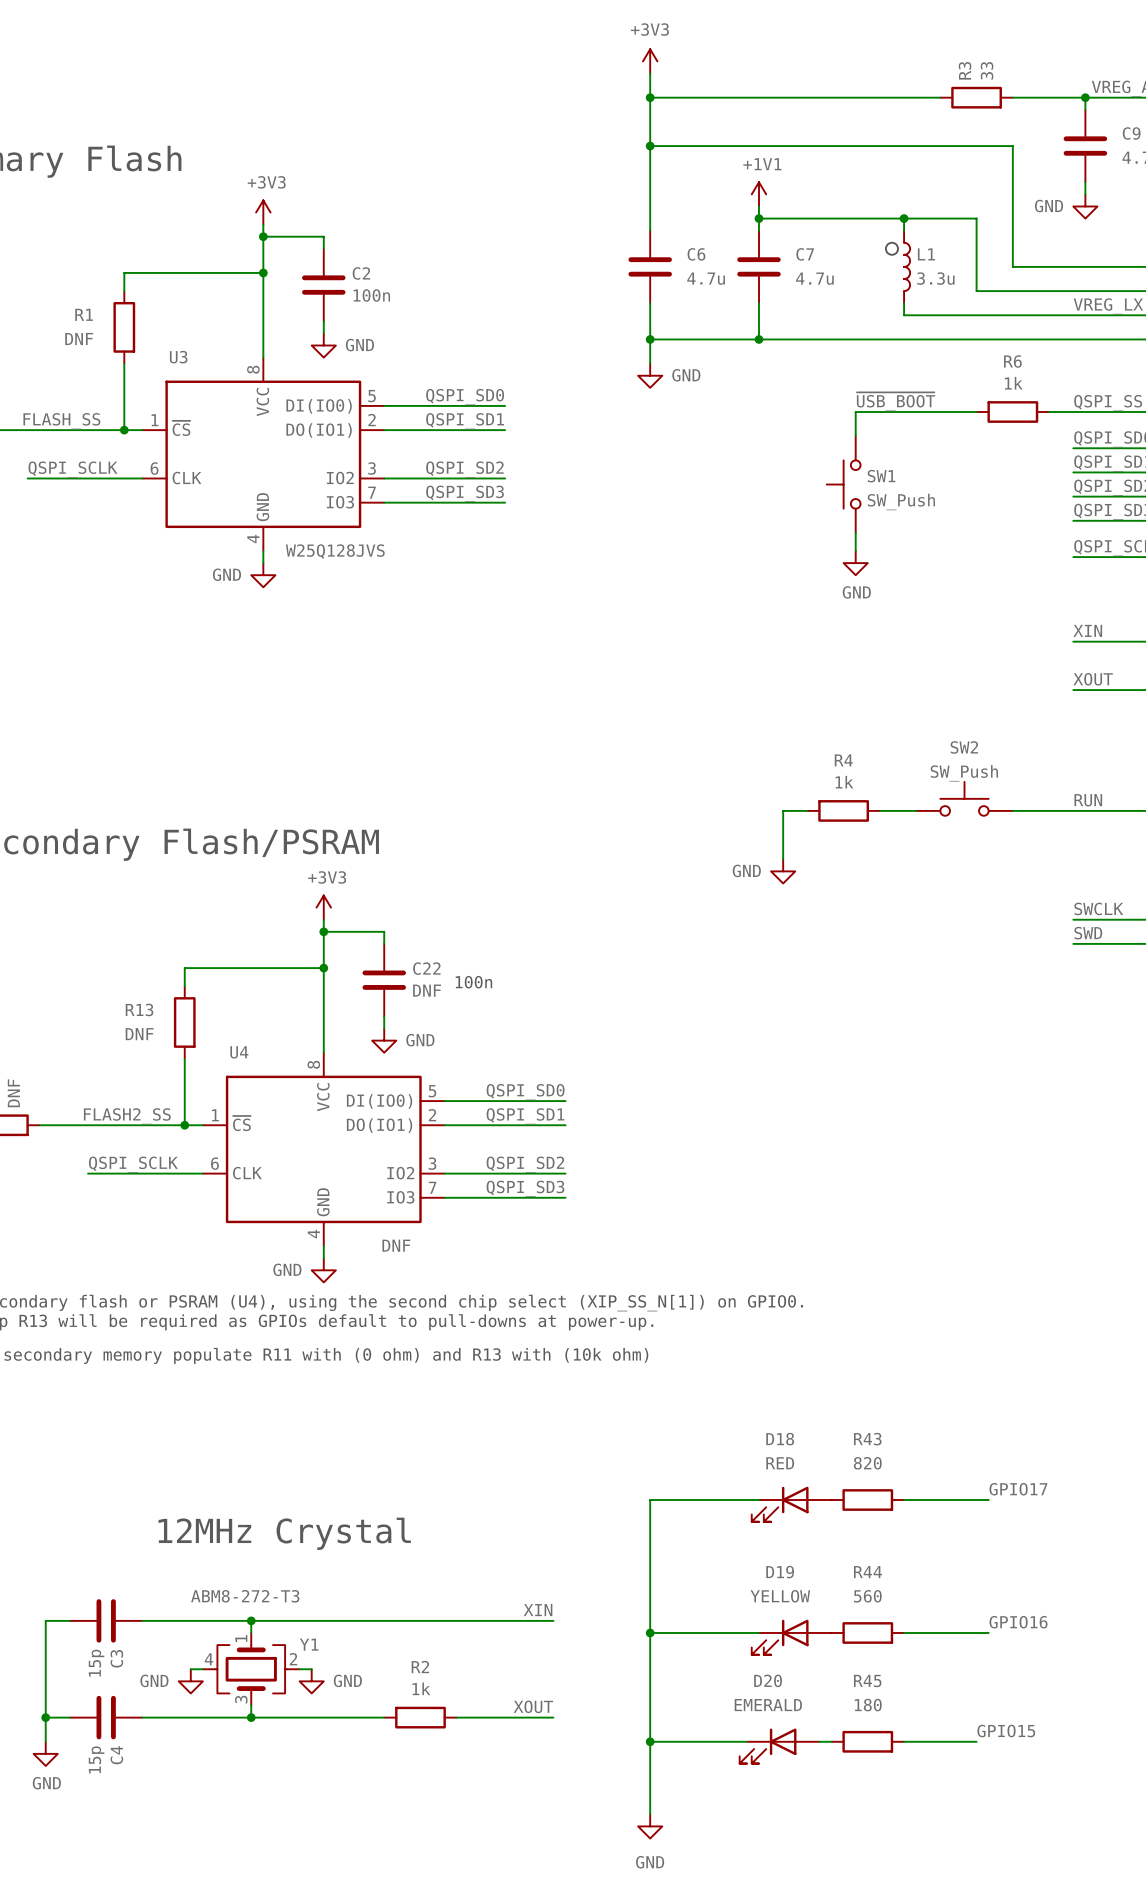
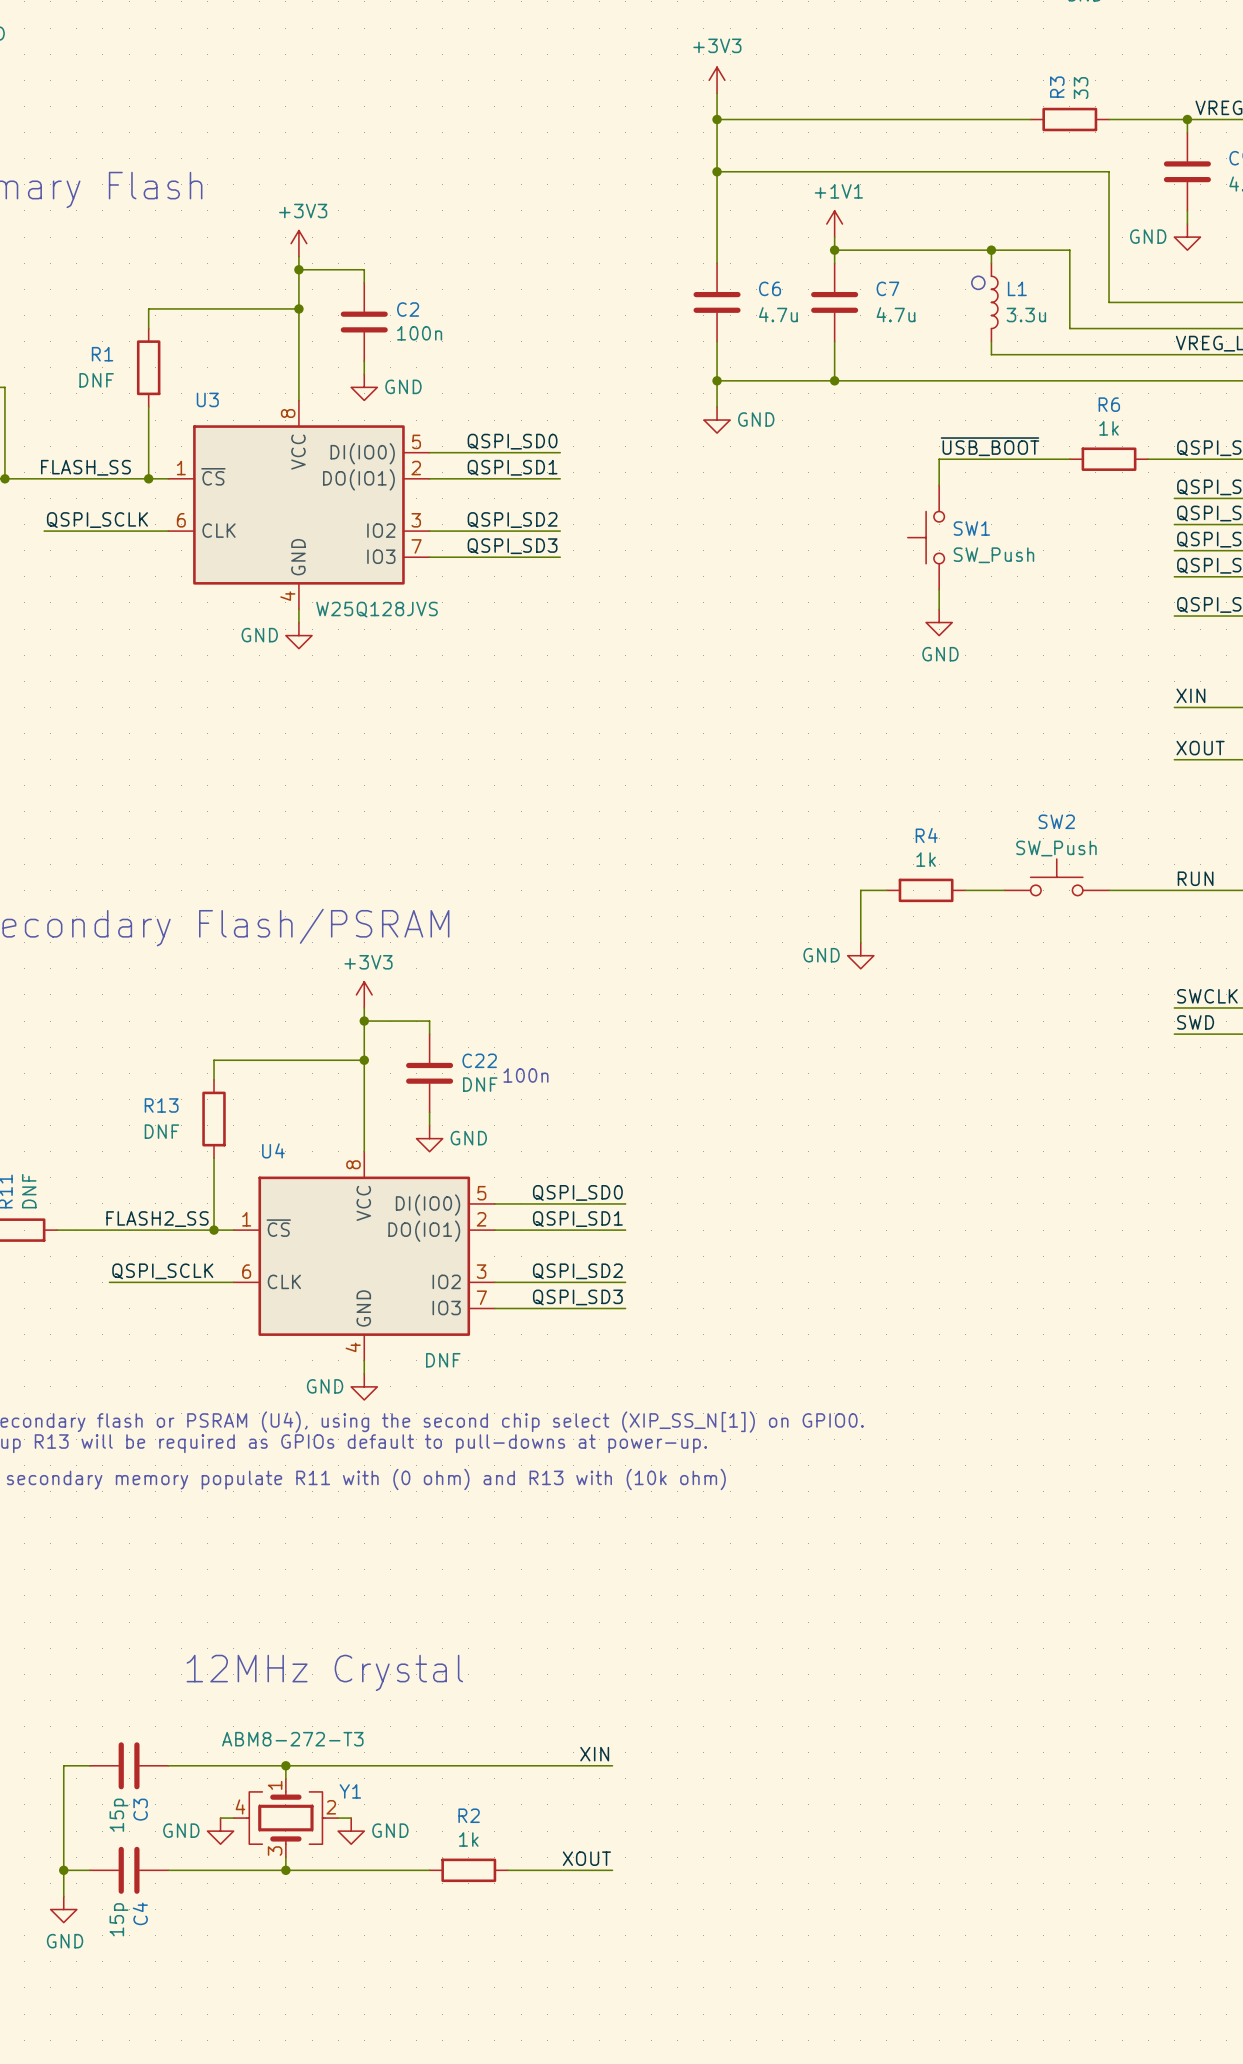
label: GPIO17 (1018, 1489) -> none
wire: (758, 1500) (650, 1500) (650, 1814) -> none
R43: 820 (867, 1500) -> none
wire: (904, 1500) (988, 1500) -> none
D18: RED (791, 1504) -> none
label: GPIO16 (1018, 1622) -> none
wire: (650, 1632) (758, 1632) -> none
junction: (650, 1632) -> none
R44: 560 (867, 1632) -> none
wire: (904, 1632) (988, 1632) -> none
D19: YELLOW (791, 1637) -> none
label: GPIO15 (1006, 1731) -> none
wire: (650, 1741) (746, 1741) -> none
junction: (650, 1741) -> none
wire: (819, 1741) (831, 1741) -> none
R45: 180 (867, 1741) -> none
wire: (904, 1741) (976, 1741) -> none
D20: EMERALD (779, 1746) -> none
power symbol: GND (650, 1826) -> none

